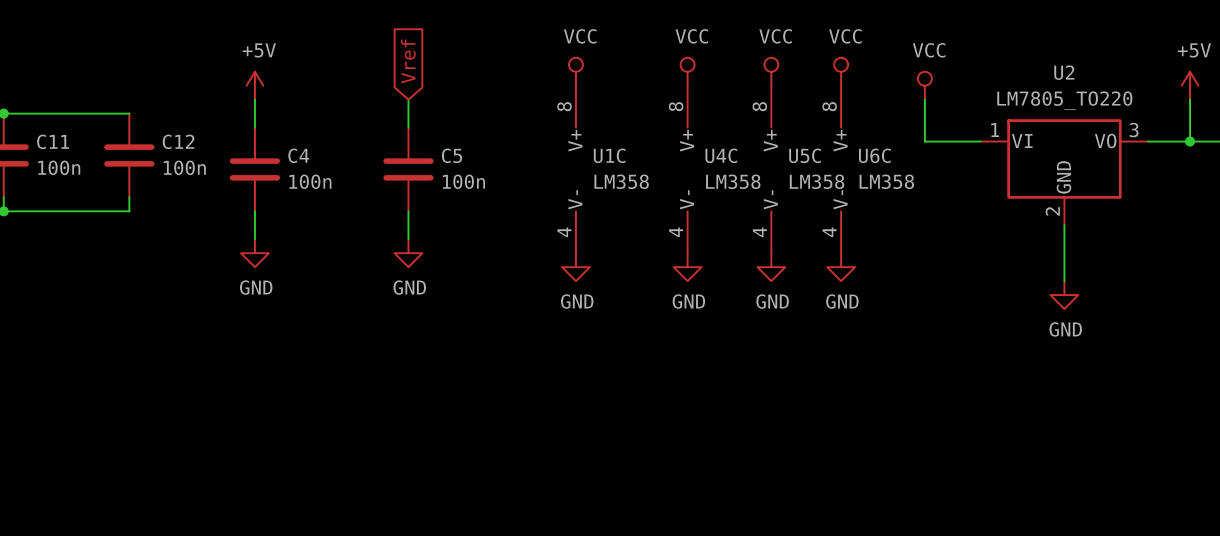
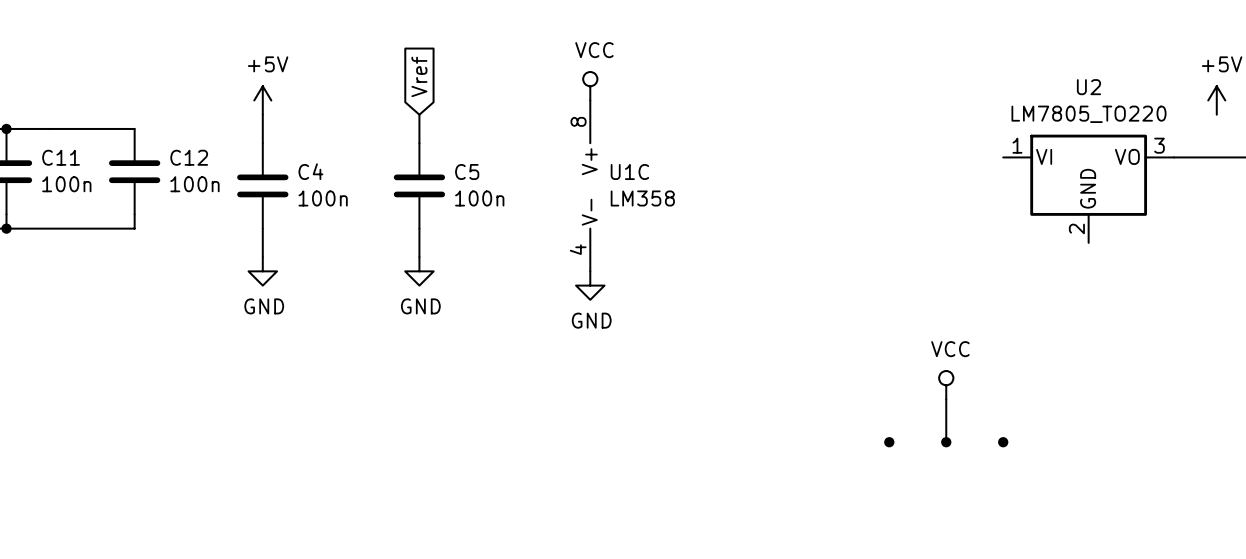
power symbol: VCC (687, 71) -> none
power symbol: VCC (771, 71) -> none
power symbol: VCC (841, 71) -> none
power symbol: VCC (924, 85) -> none
wire: (924, 99) (924, 141) (980, 141) -> none
wire: (1190, 99) (1190, 141) -> none
junction: (1190, 141) -> none
U4C: LM358 (687, 169) -> none
U5C: LM358 (771, 169) -> none
U6C: LM358 (841, 169) -> none
wire: (1064, 225) (1064, 281) -> none
power symbol: GND (687, 267) -> none
power symbol: GND (771, 267) -> none
power symbol: GND (841, 267) -> none
power symbol: GND (1064, 295) -> none
power symbol: none -> VCC (946, 385)
wire: none -> (946, 399) (946, 442)
junction: none -> (889, 442)
junction: none -> (946, 442)
junction: none -> (1003, 442)

